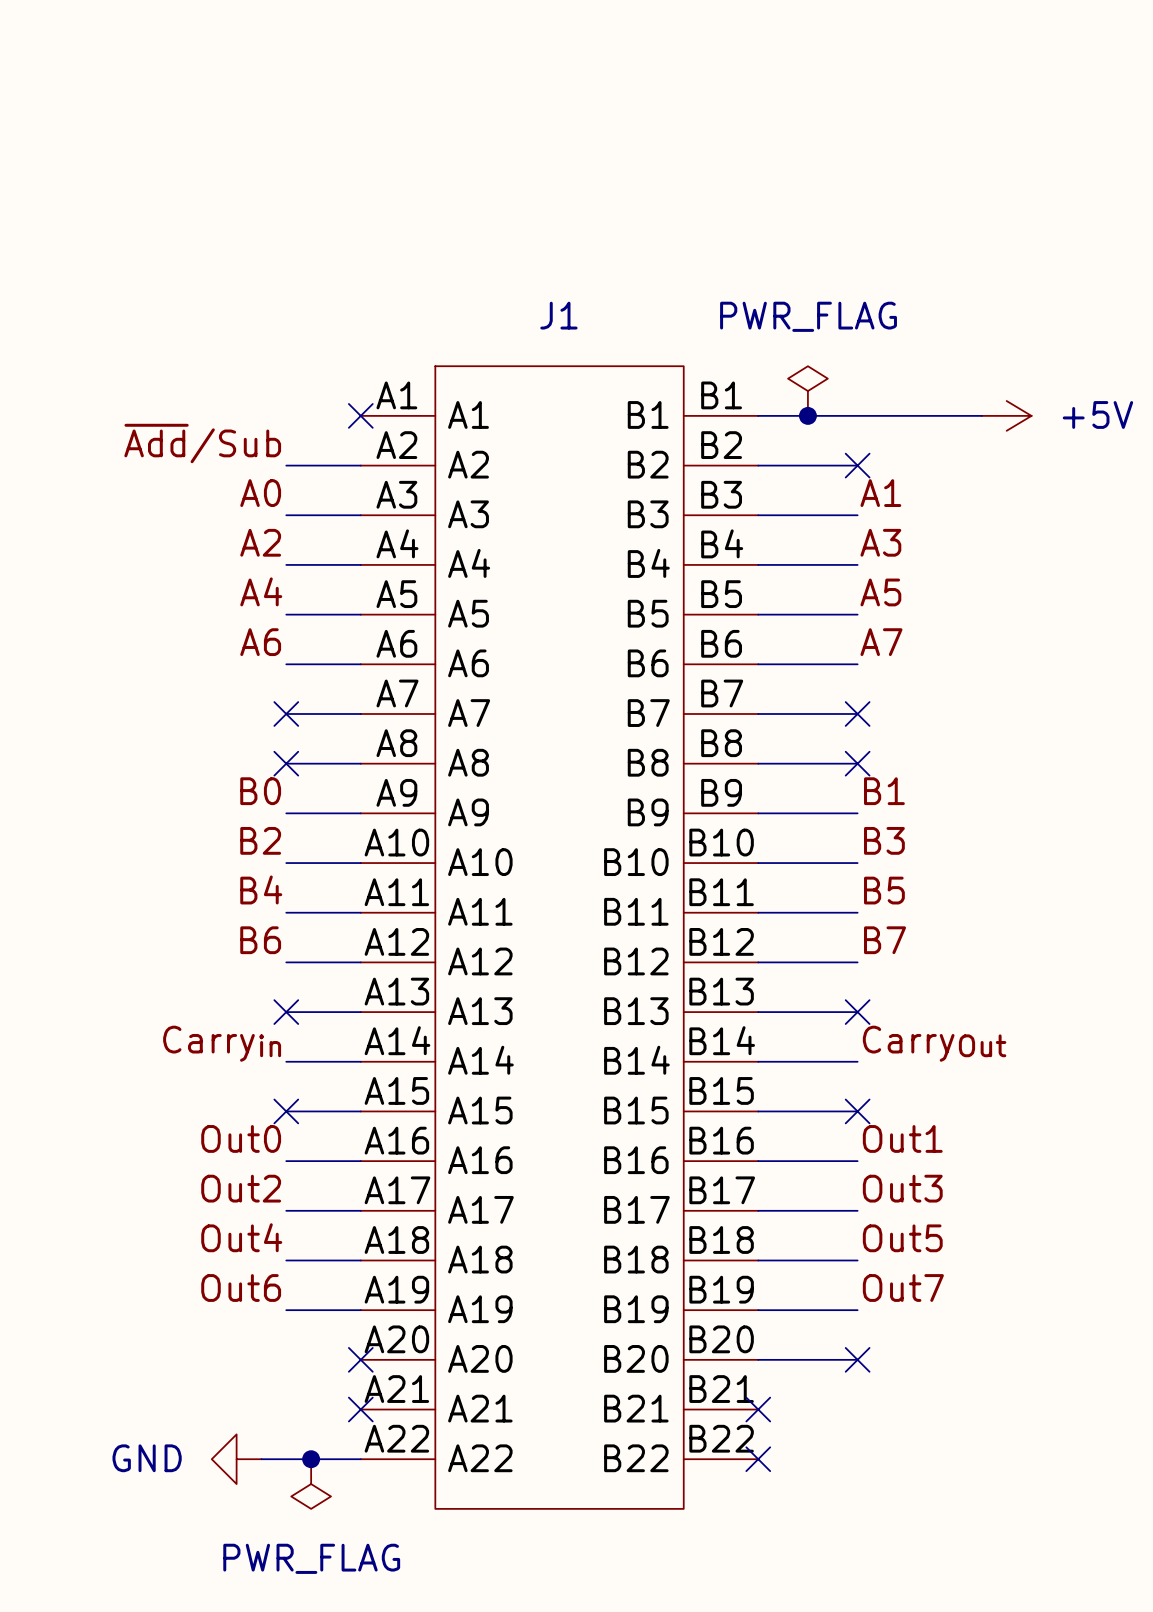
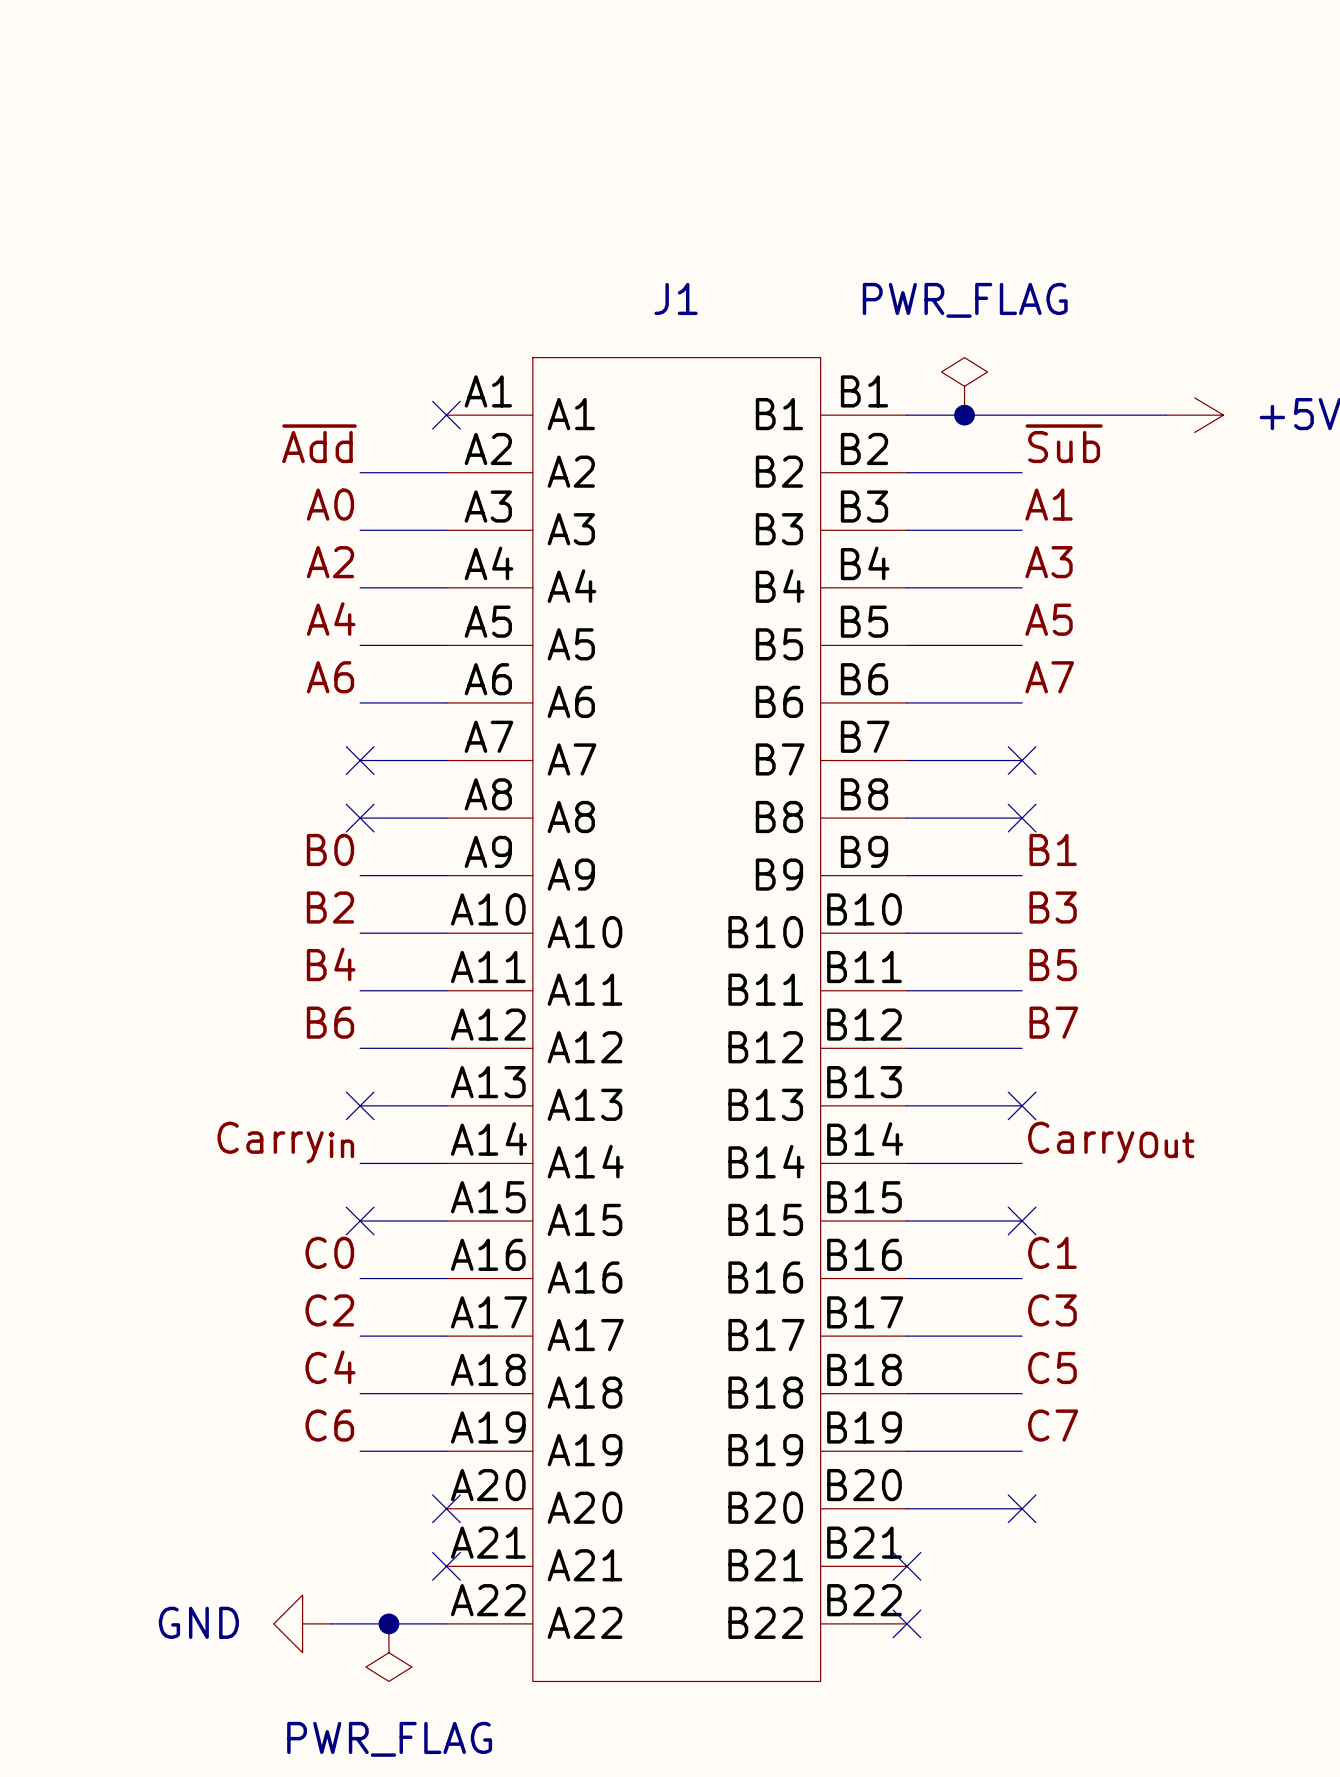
label: none -> ~{Sub} (1064, 443)
label: ~{Add}/Sub (202, 443) -> ~{Add} (319, 443)
no-connect mark: (857, 465) -> none
label: Out0 (241, 1138) -> C0 (329, 1252)
label: Out1 (902, 1138) -> C1 (1052, 1252)
label: Out2 (241, 1188) -> C2 (329, 1310)
label: Out3 (902, 1188) -> C3 (1052, 1310)
label: Out4 (241, 1237) -> C4 (330, 1367)
label: Out5 (902, 1238) -> C5 (1052, 1367)
label: Out6 (241, 1288) -> C6 (329, 1425)
label: Out7 (903, 1288) -> C7 (1053, 1425)

